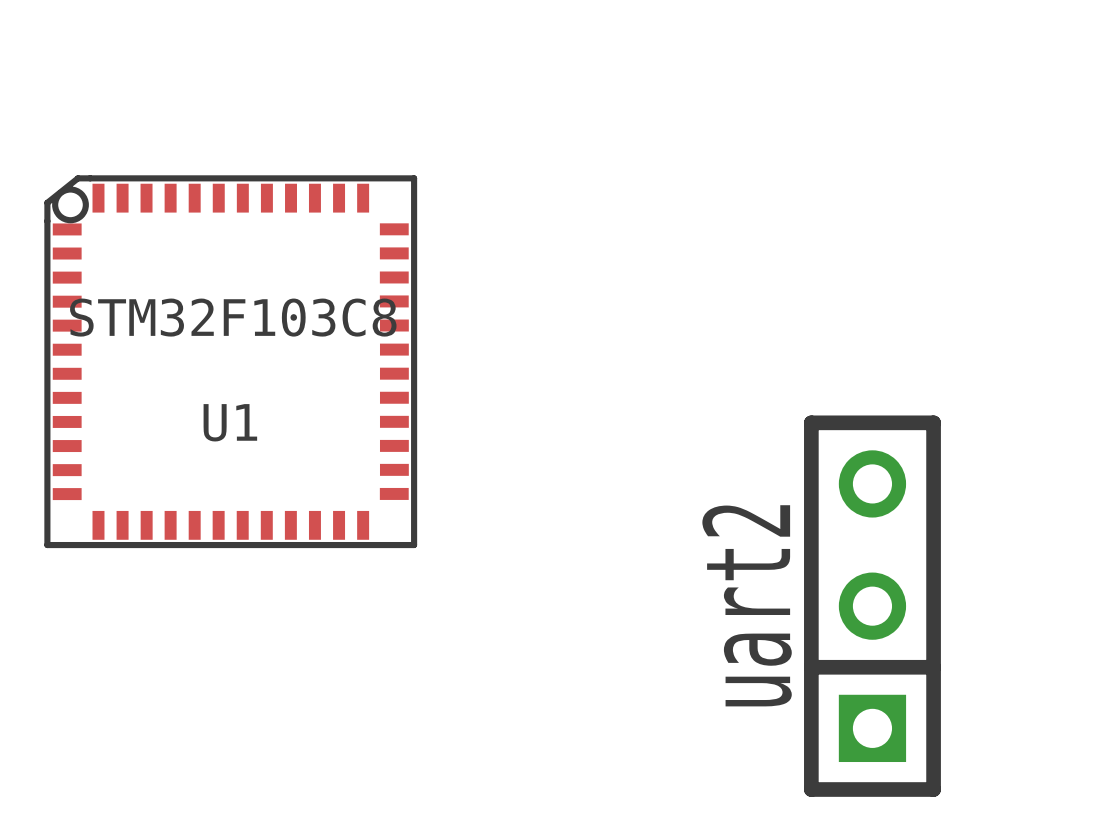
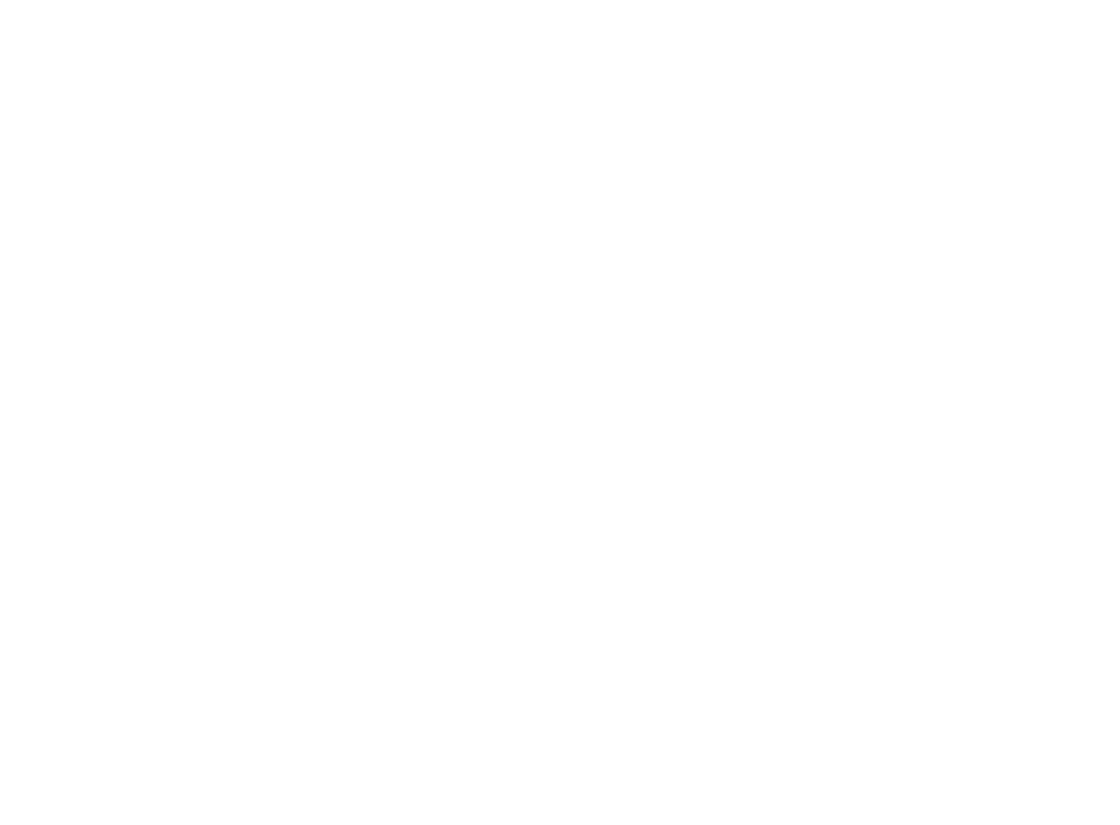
U1: STM32F103C8 (230, 361) -> none
uart2: (872, 606) -> none

